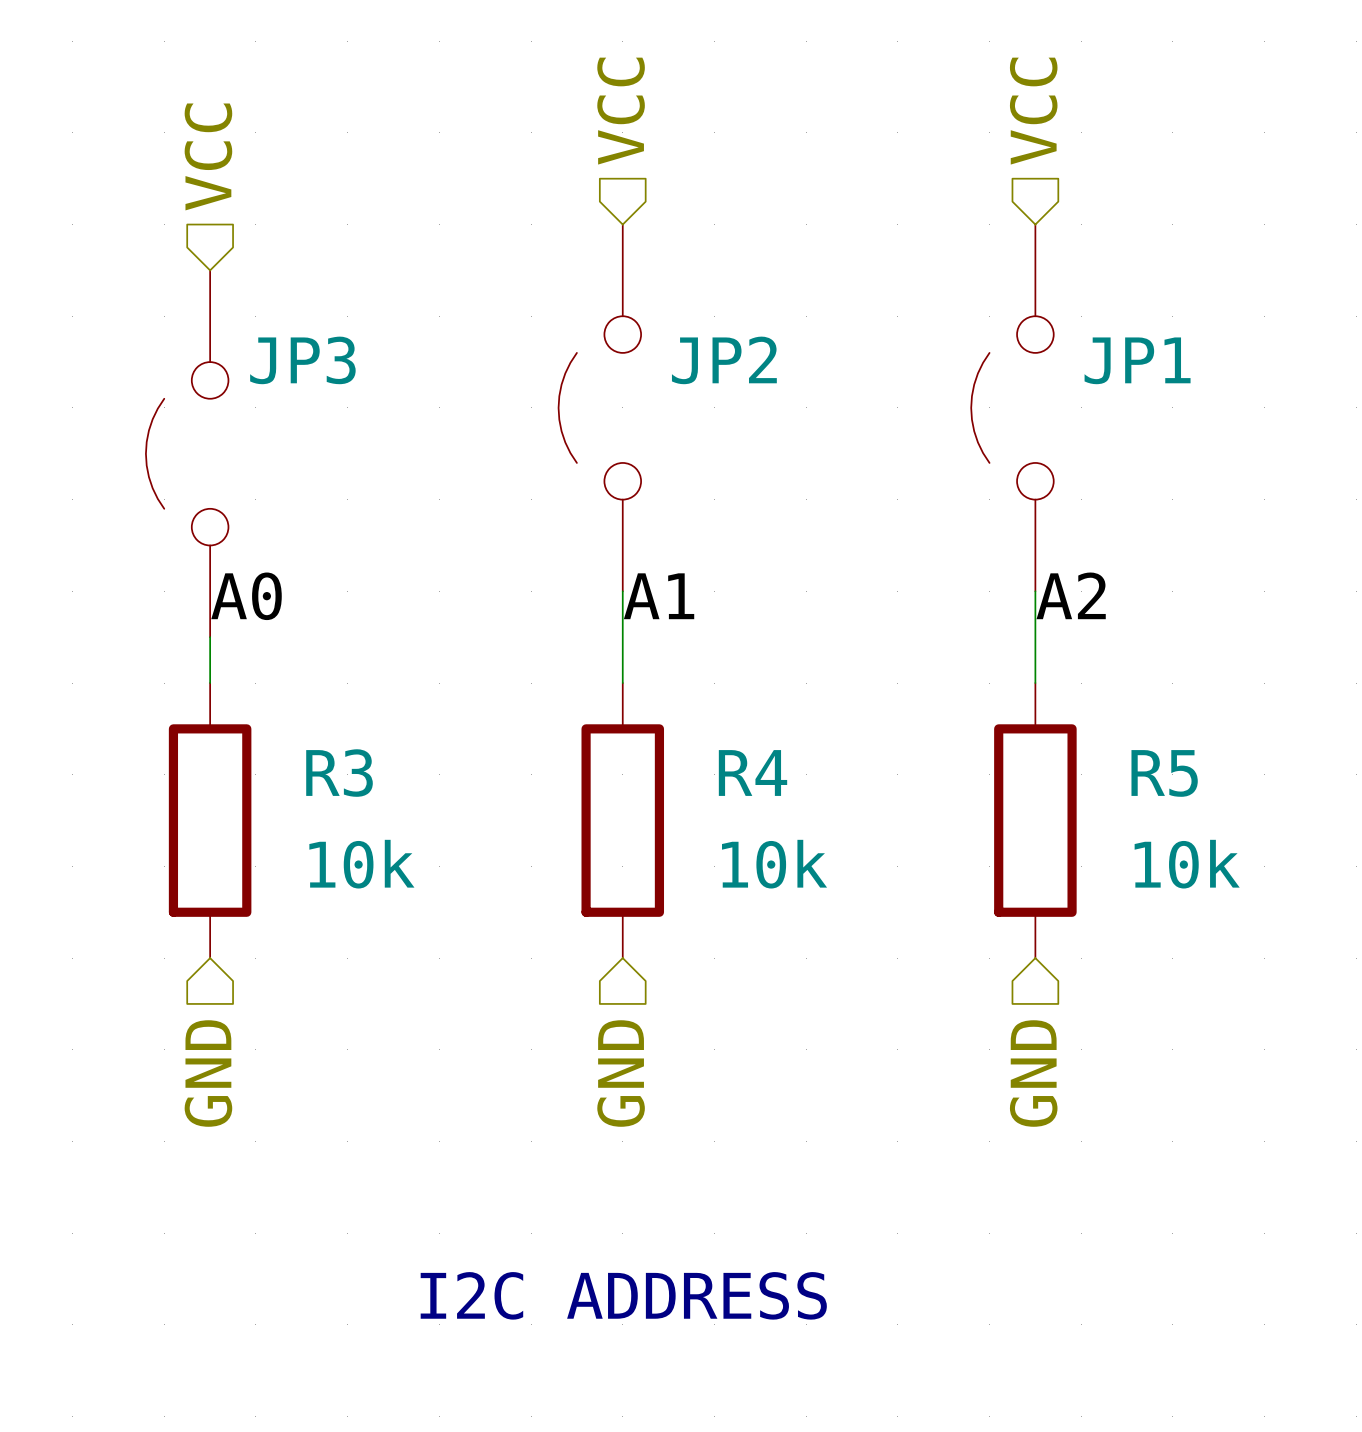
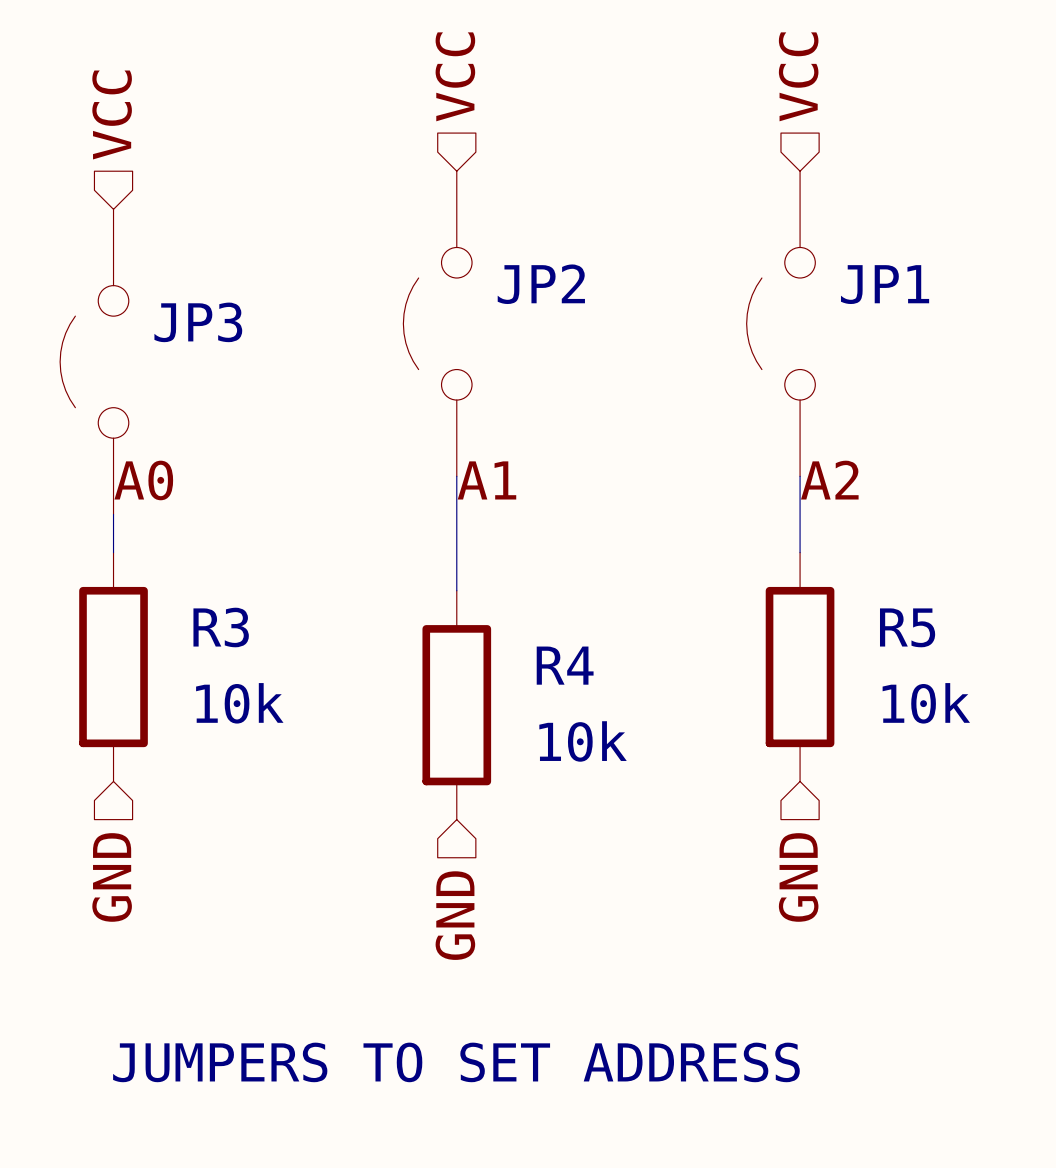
JP3 name position: JP3 (302, 360) -> JP3 (198, 322)
R4 position: (622, 820) -> (456, 705)
hierarchical label position: GND (621, 1073) -> GND (455, 915)
text: I2C ADDRESS (623, 1295) -> JUMPERS TO SET ADDRESS (456, 1062)

